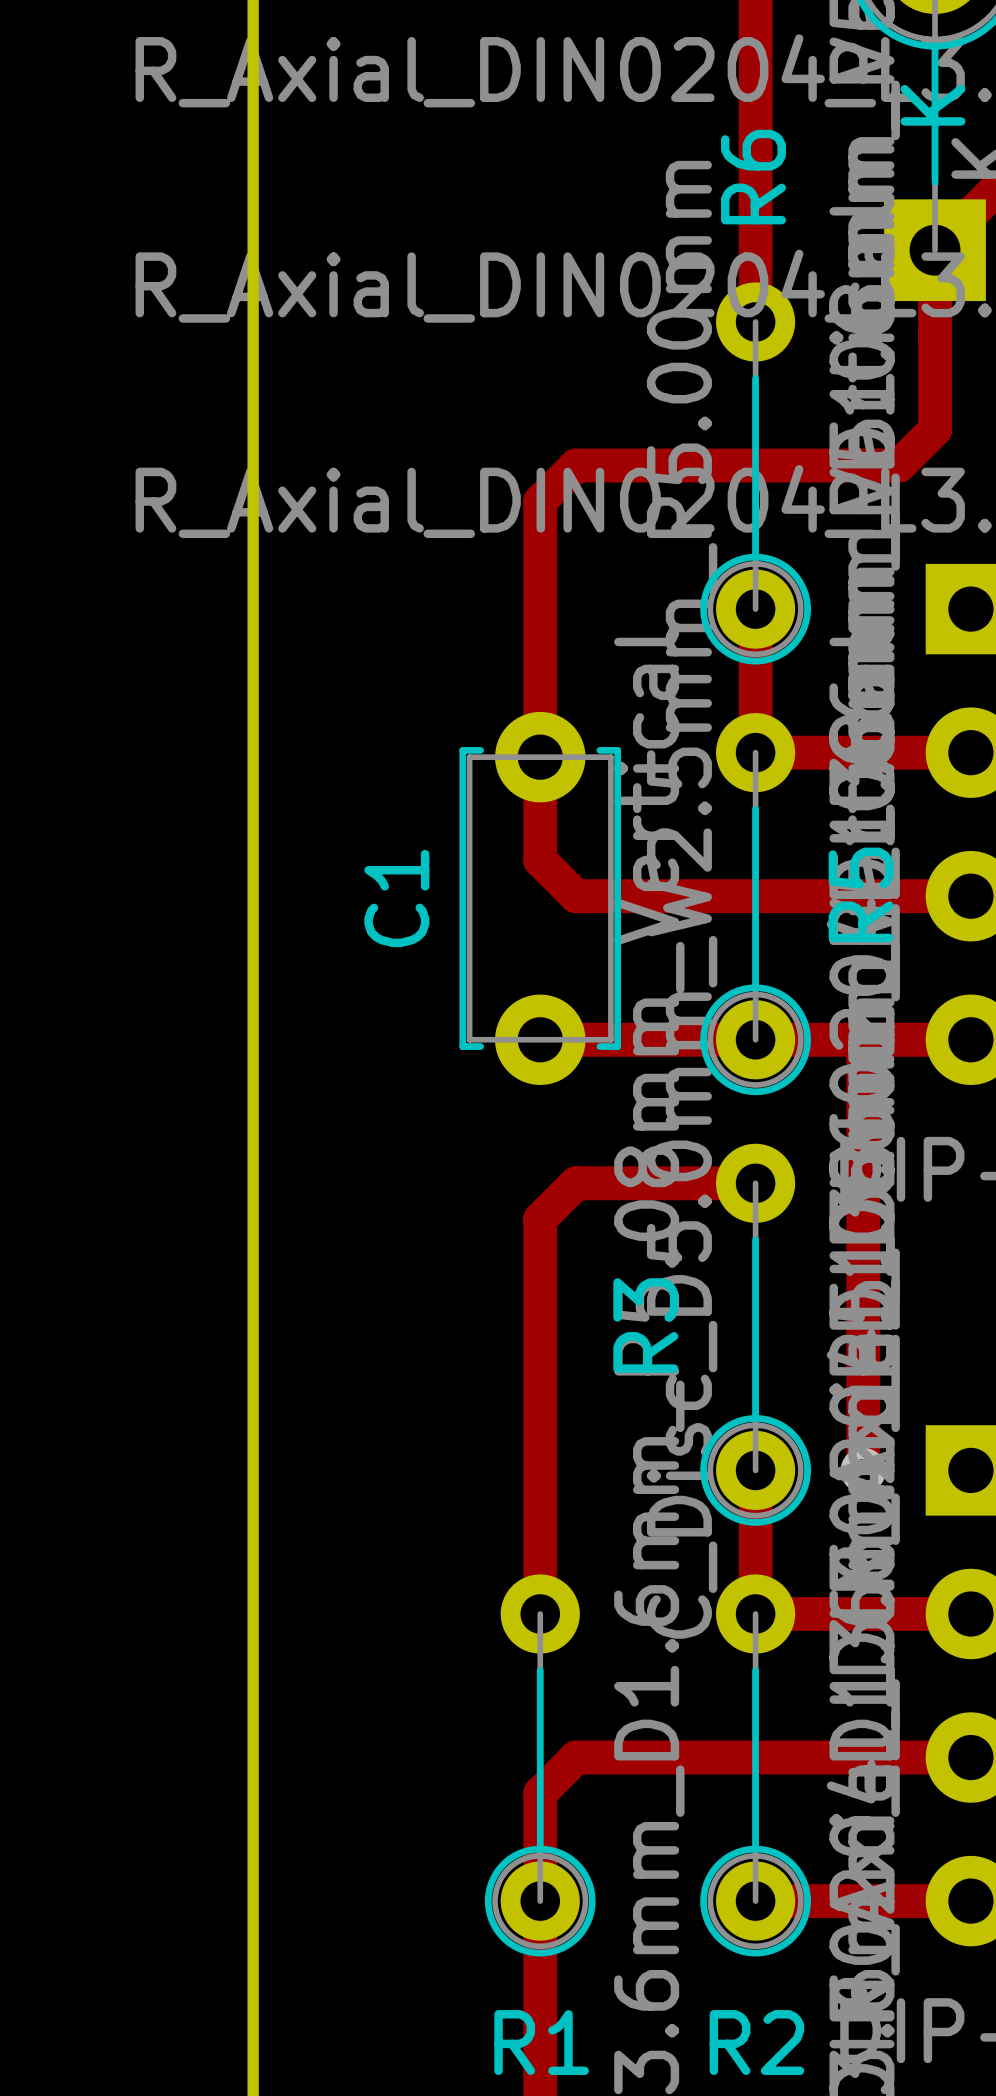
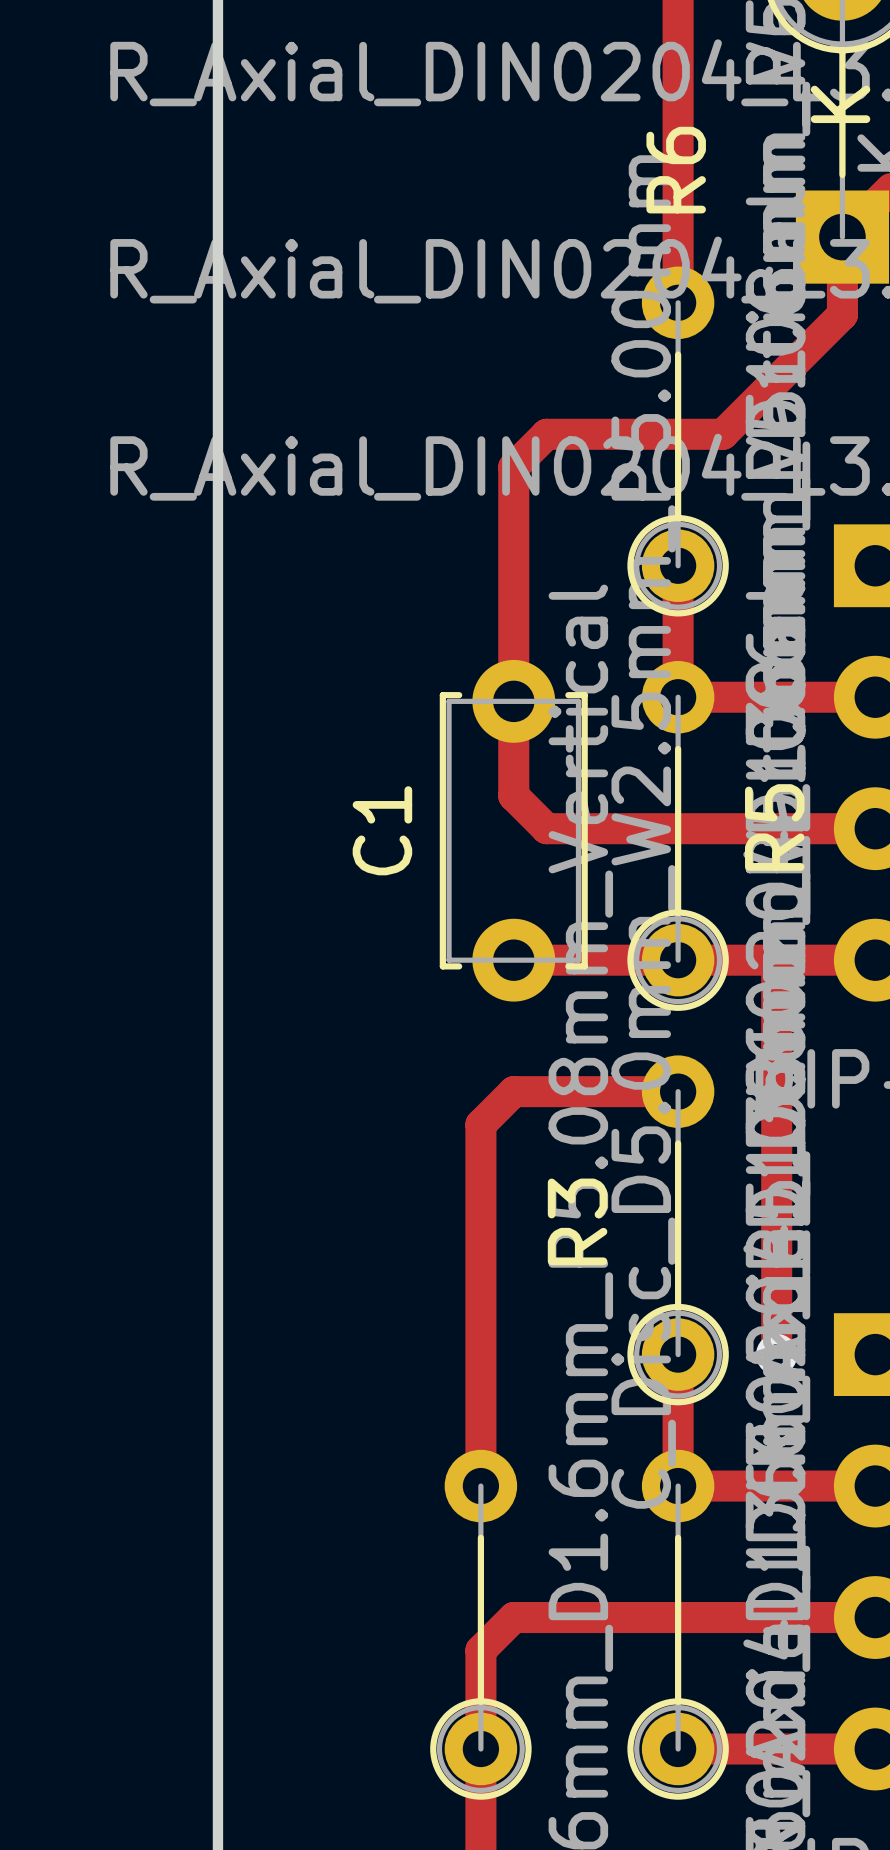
track: (935, 334) (935, 429) (899, 465) (804, 465) -> (842, 314) (722, 434)
track: (612, 465) (576, 465) (540, 501) (540, 860) (576, 896) (612, 896) -> (546, 434) (513, 467) (513, 795) (546, 828)
C1 position: (540, 898) -> (513, 830)

